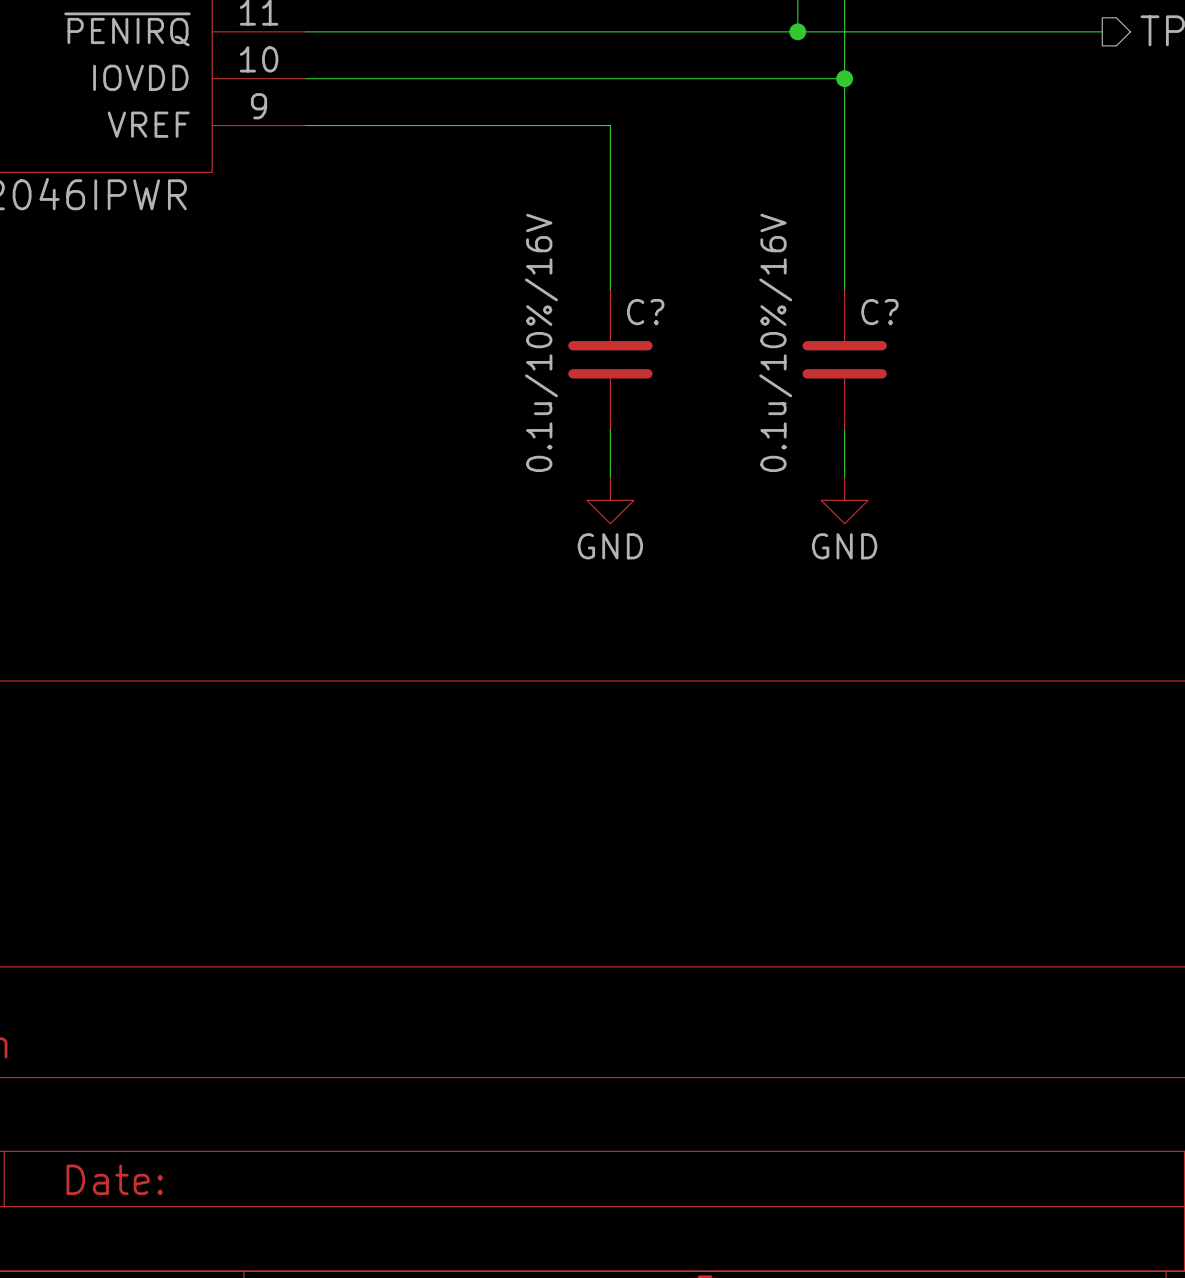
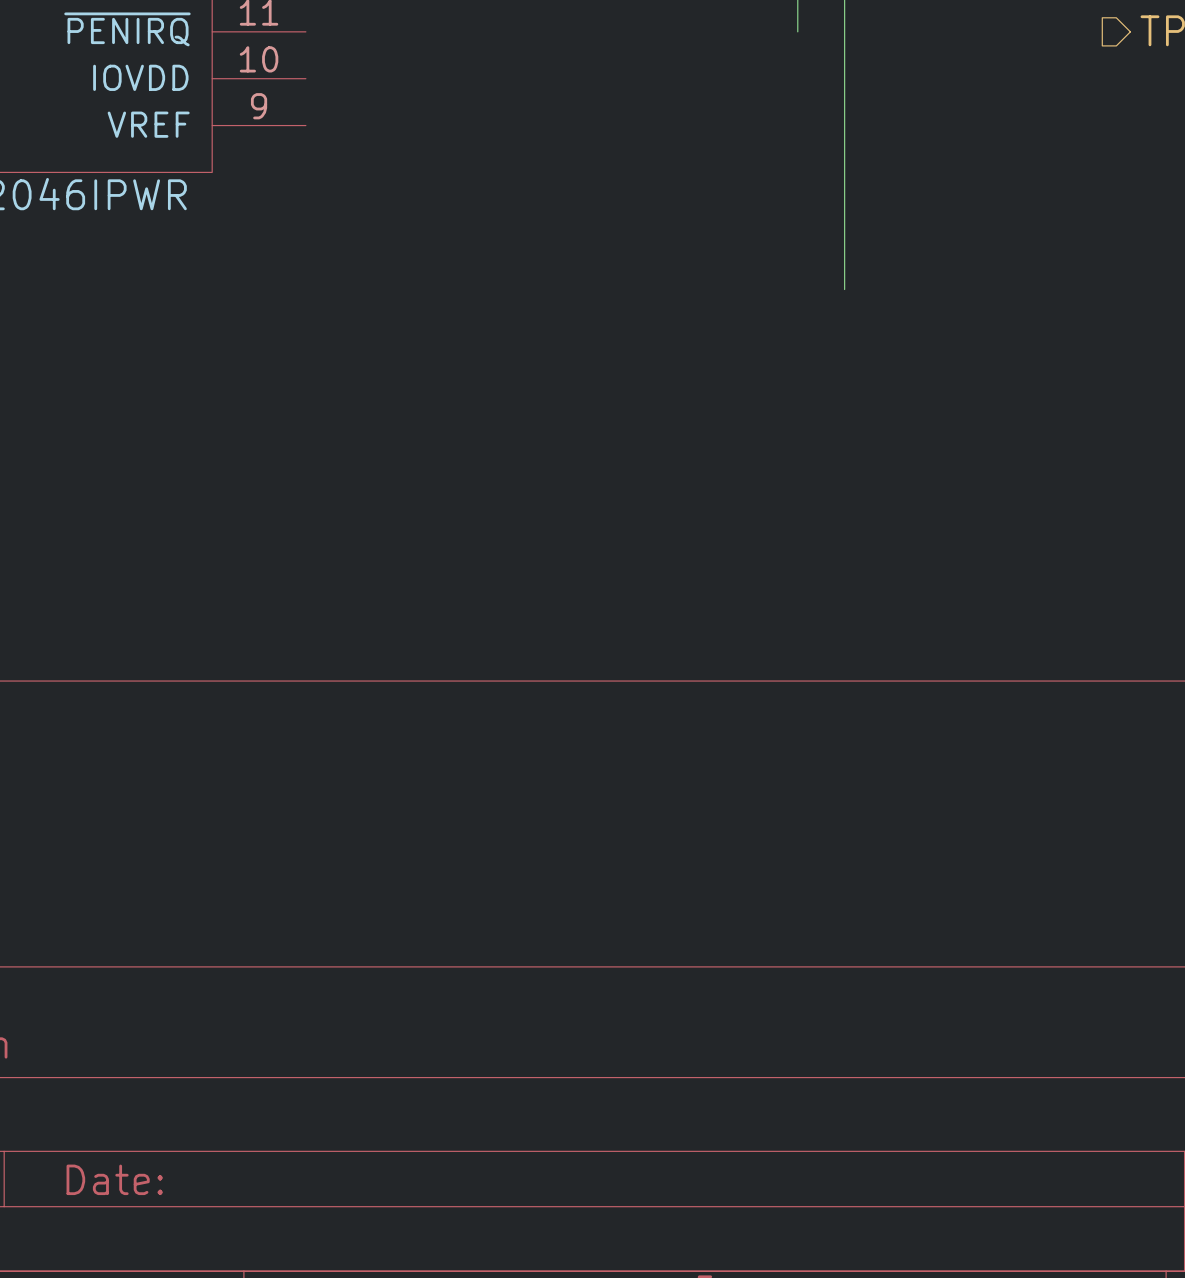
wire: (305, 31) (1102, 31) -> none
junction: (797, 31) -> none
wire: (305, 78) (844, 78) -> none
junction: (844, 78) -> none
wire: (305, 125) (610, 125) (610, 289) -> none
C?: 0.1u/10%/16V (610, 359) -> none
C?: 0.1u/10%/16V (844, 359) -> none
wire: (610, 430) (610, 476) -> none
wire: (844, 430) (844, 476) -> none
power symbol: GND (610, 500) -> none
power symbol: GND (844, 500) -> none

